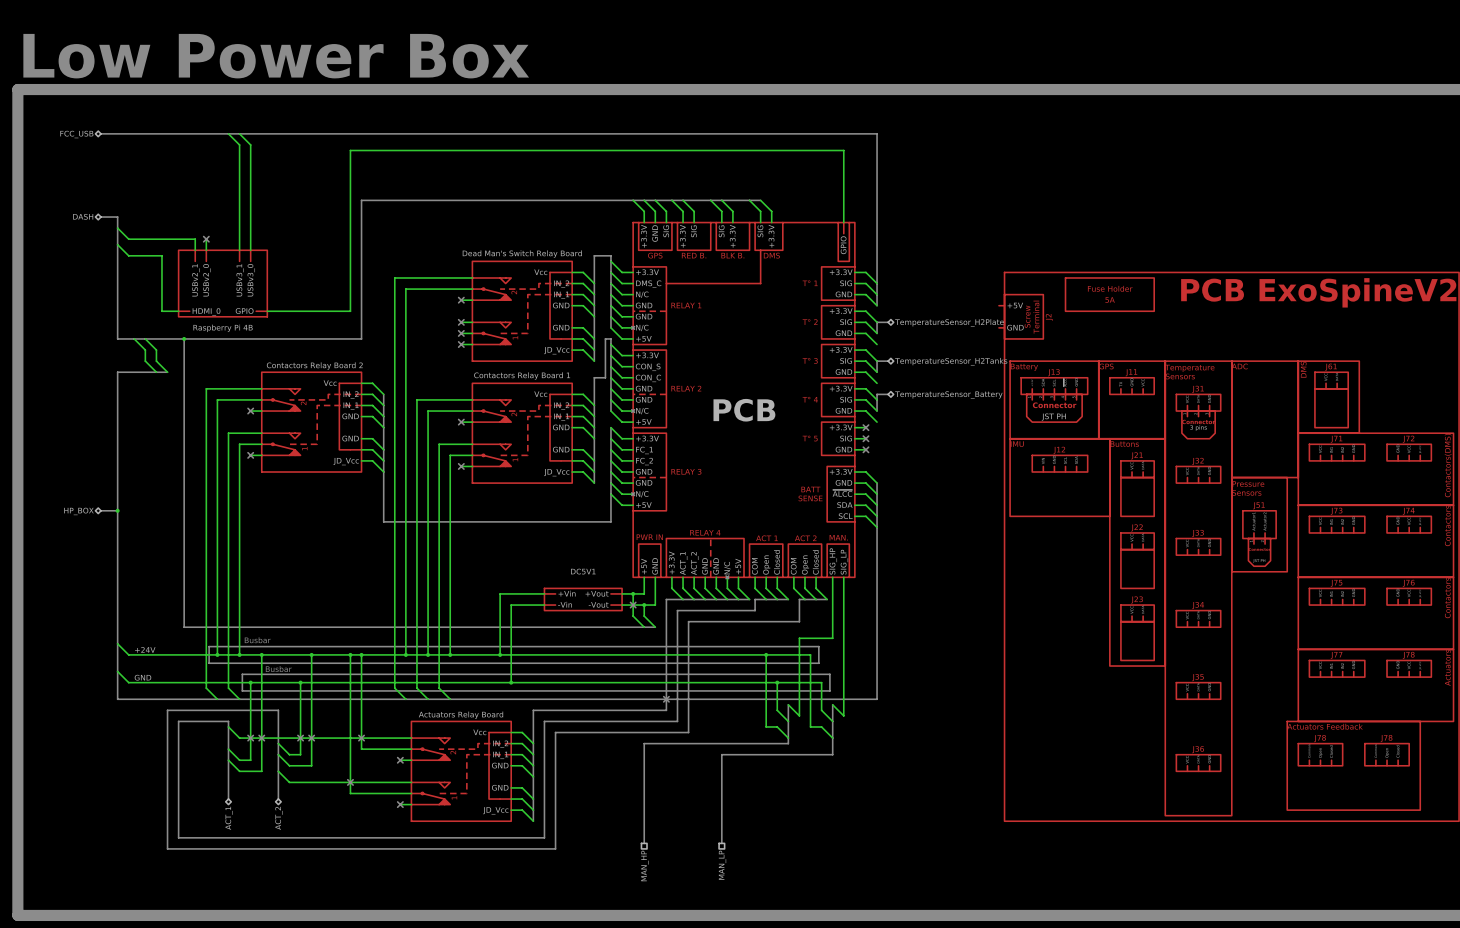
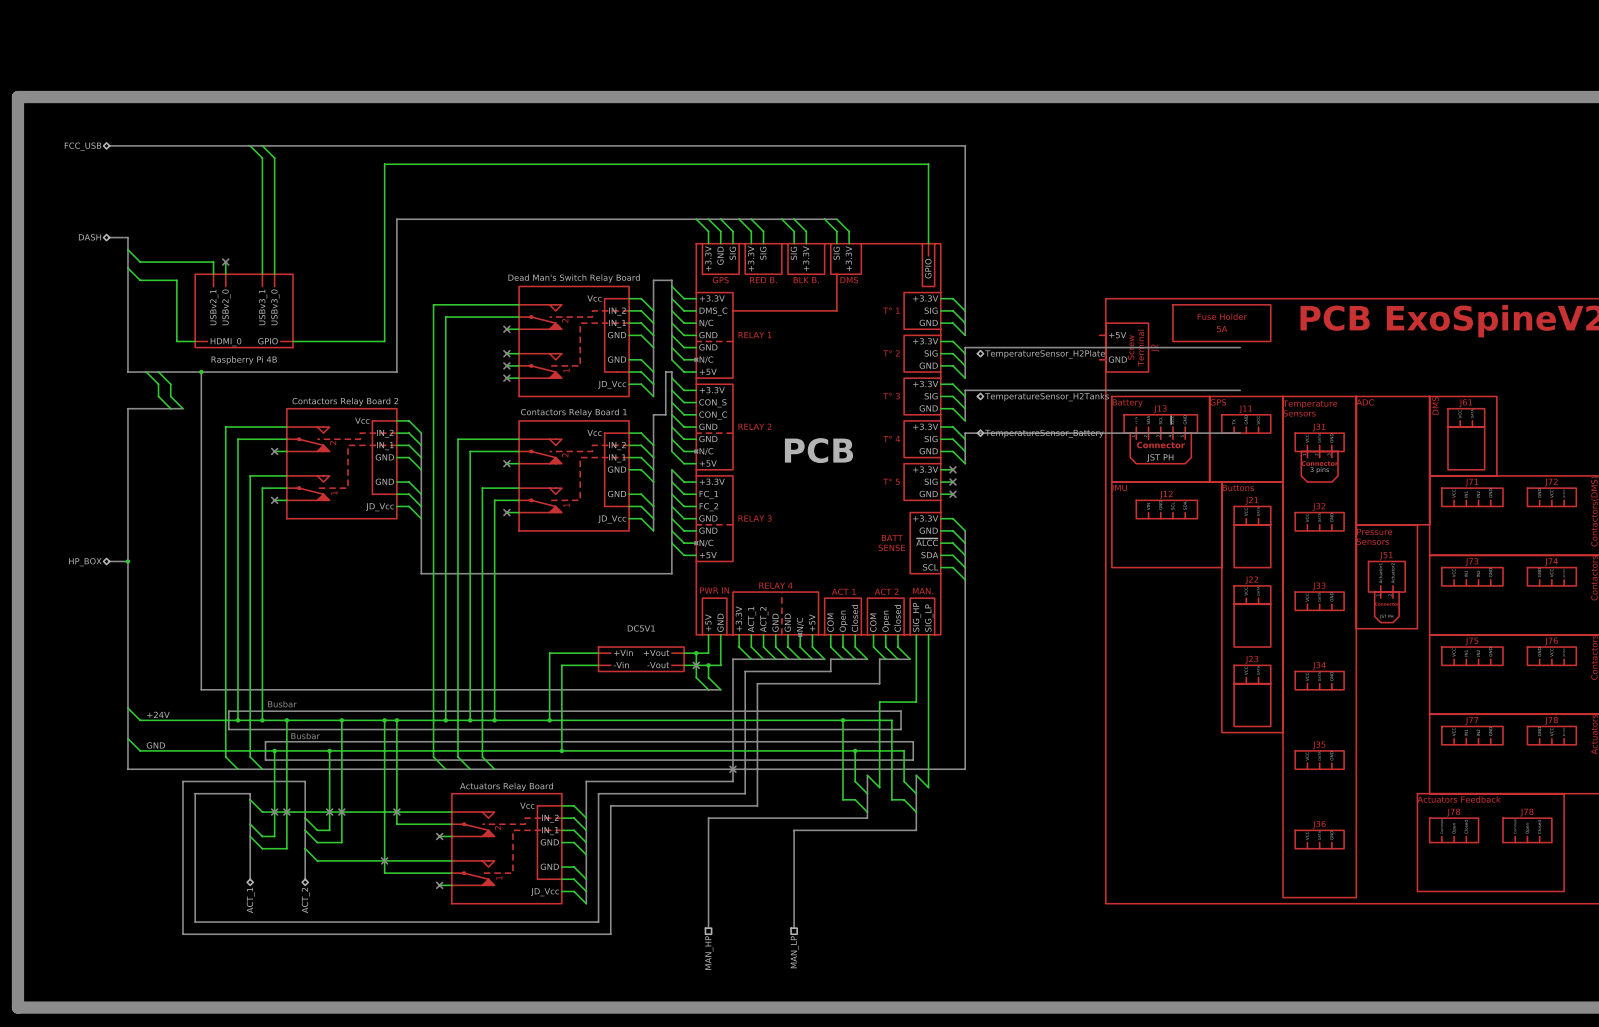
text: Low Power Box (276, 56) -> none
bus: (877, 322) (888, 322) -> (965, 353) (965, 347) (1240, 347)
bus: none -> (965, 365) (965, 378)
bus: (877, 361) (888, 361) -> (965, 396) (965, 390) (1240, 390)
bus: none -> (965, 408) (965, 420)
bus: none -> (977, 433) (1240, 433)
bus: none -> (965, 451) (965, 463)

